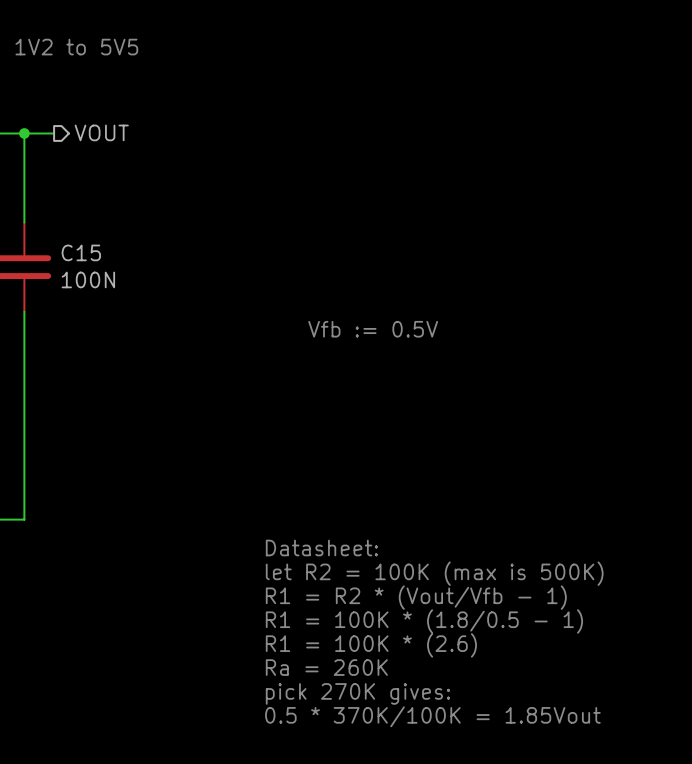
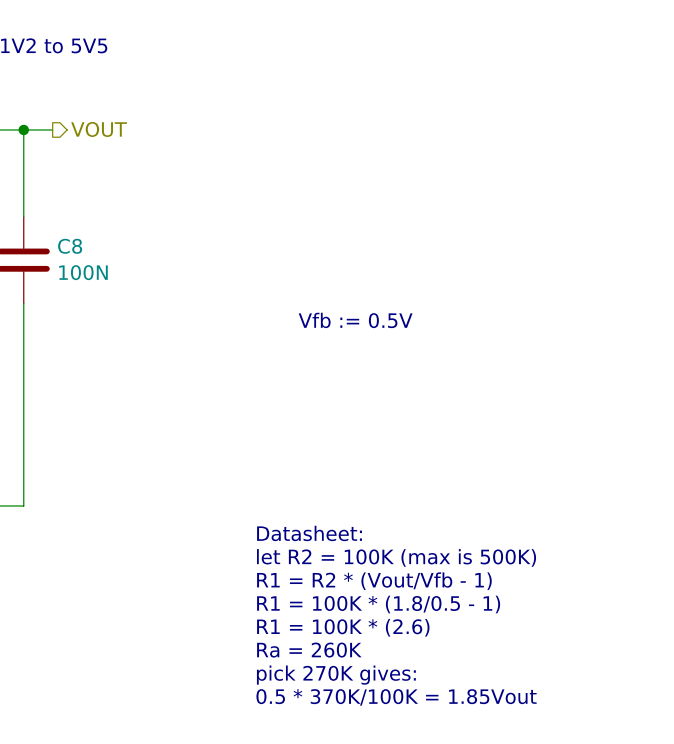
C15 name: C15 (81, 252) -> C8 (70, 246)

